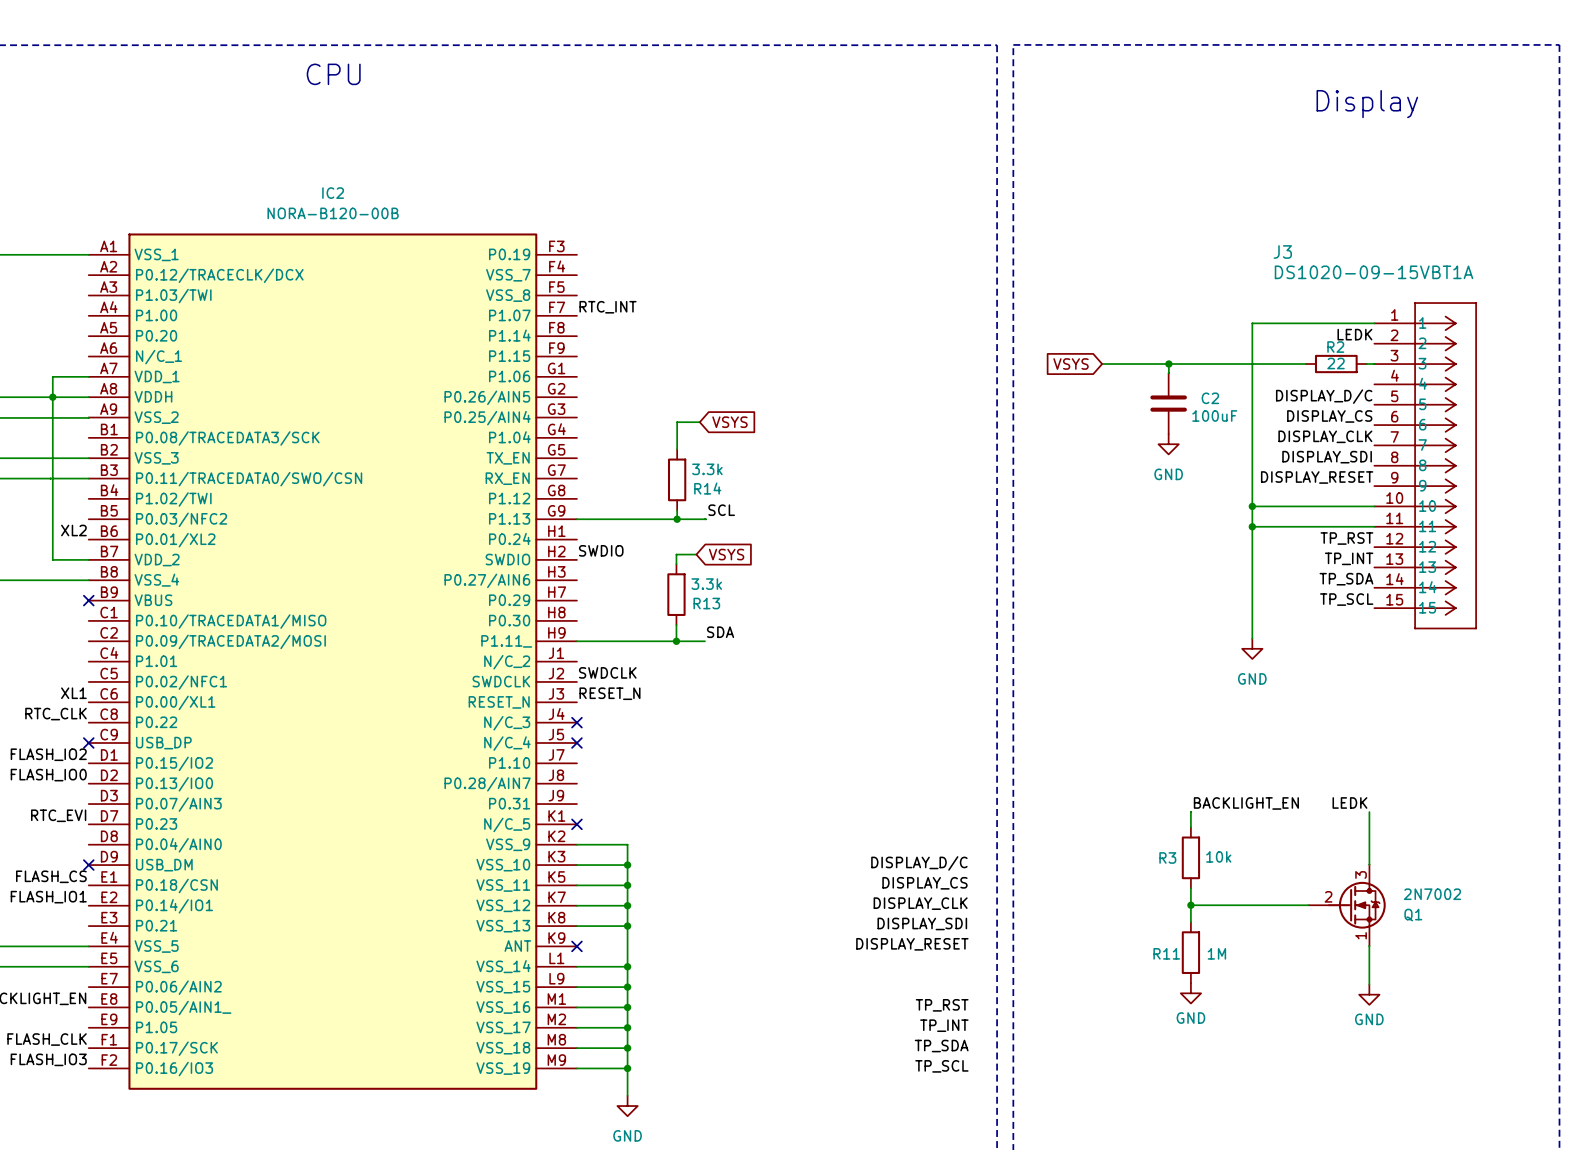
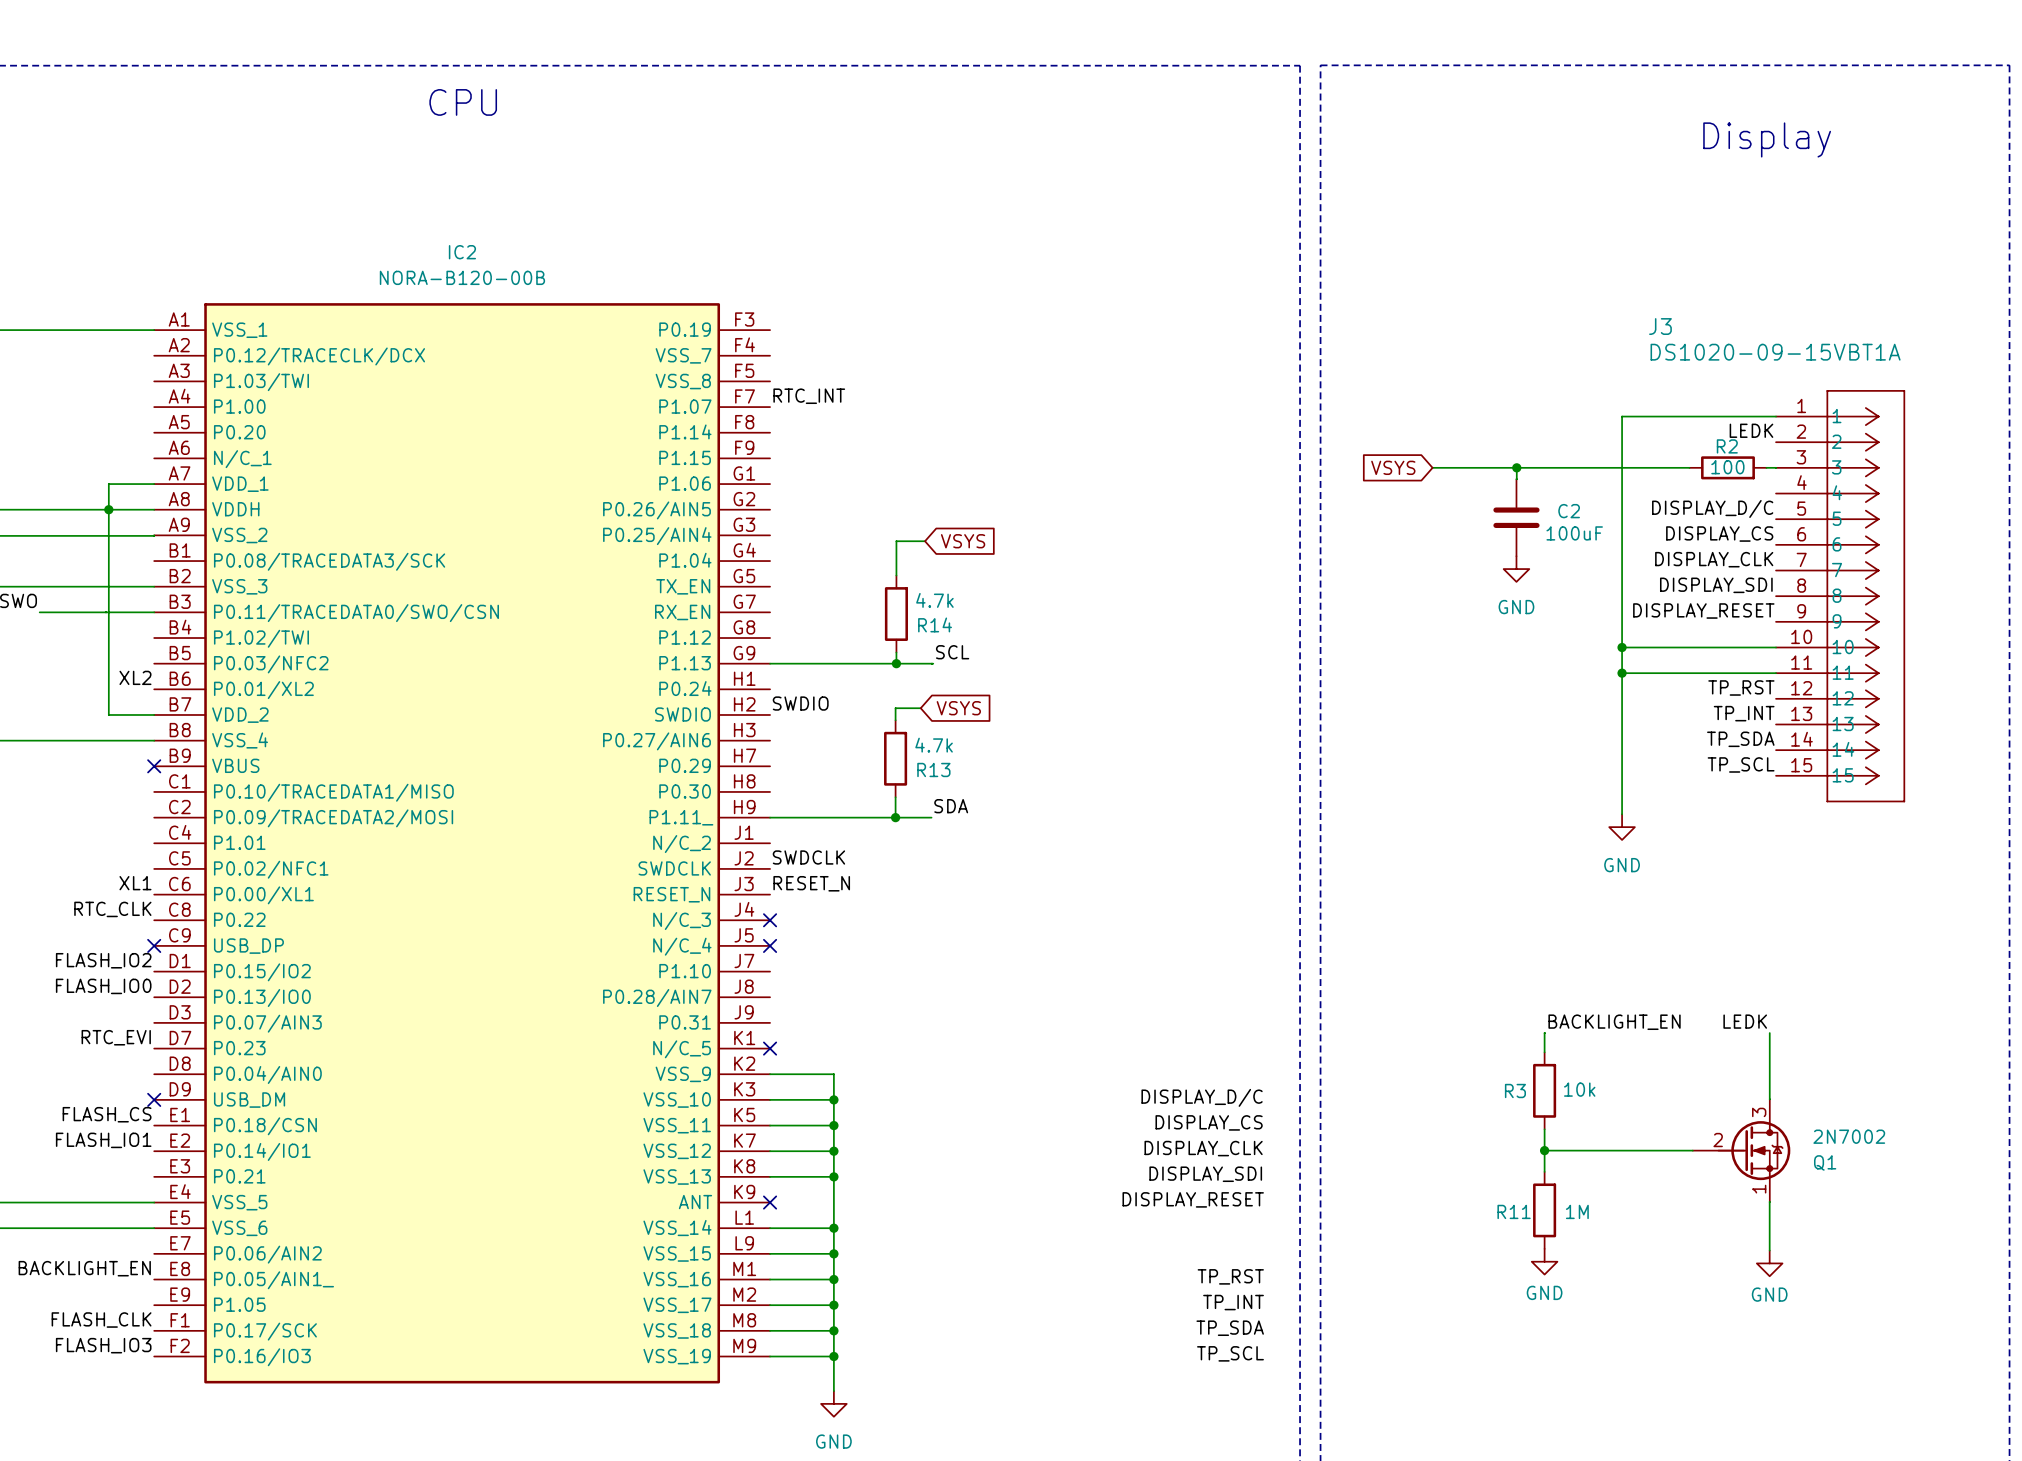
R2 value: 22 (1335, 363) -> 100 (1727, 467)
R14 value: 3.3k (707, 469) -> 4.7k (934, 600)
R13 value: 3.3k (706, 584) -> 4.7k (934, 745)

